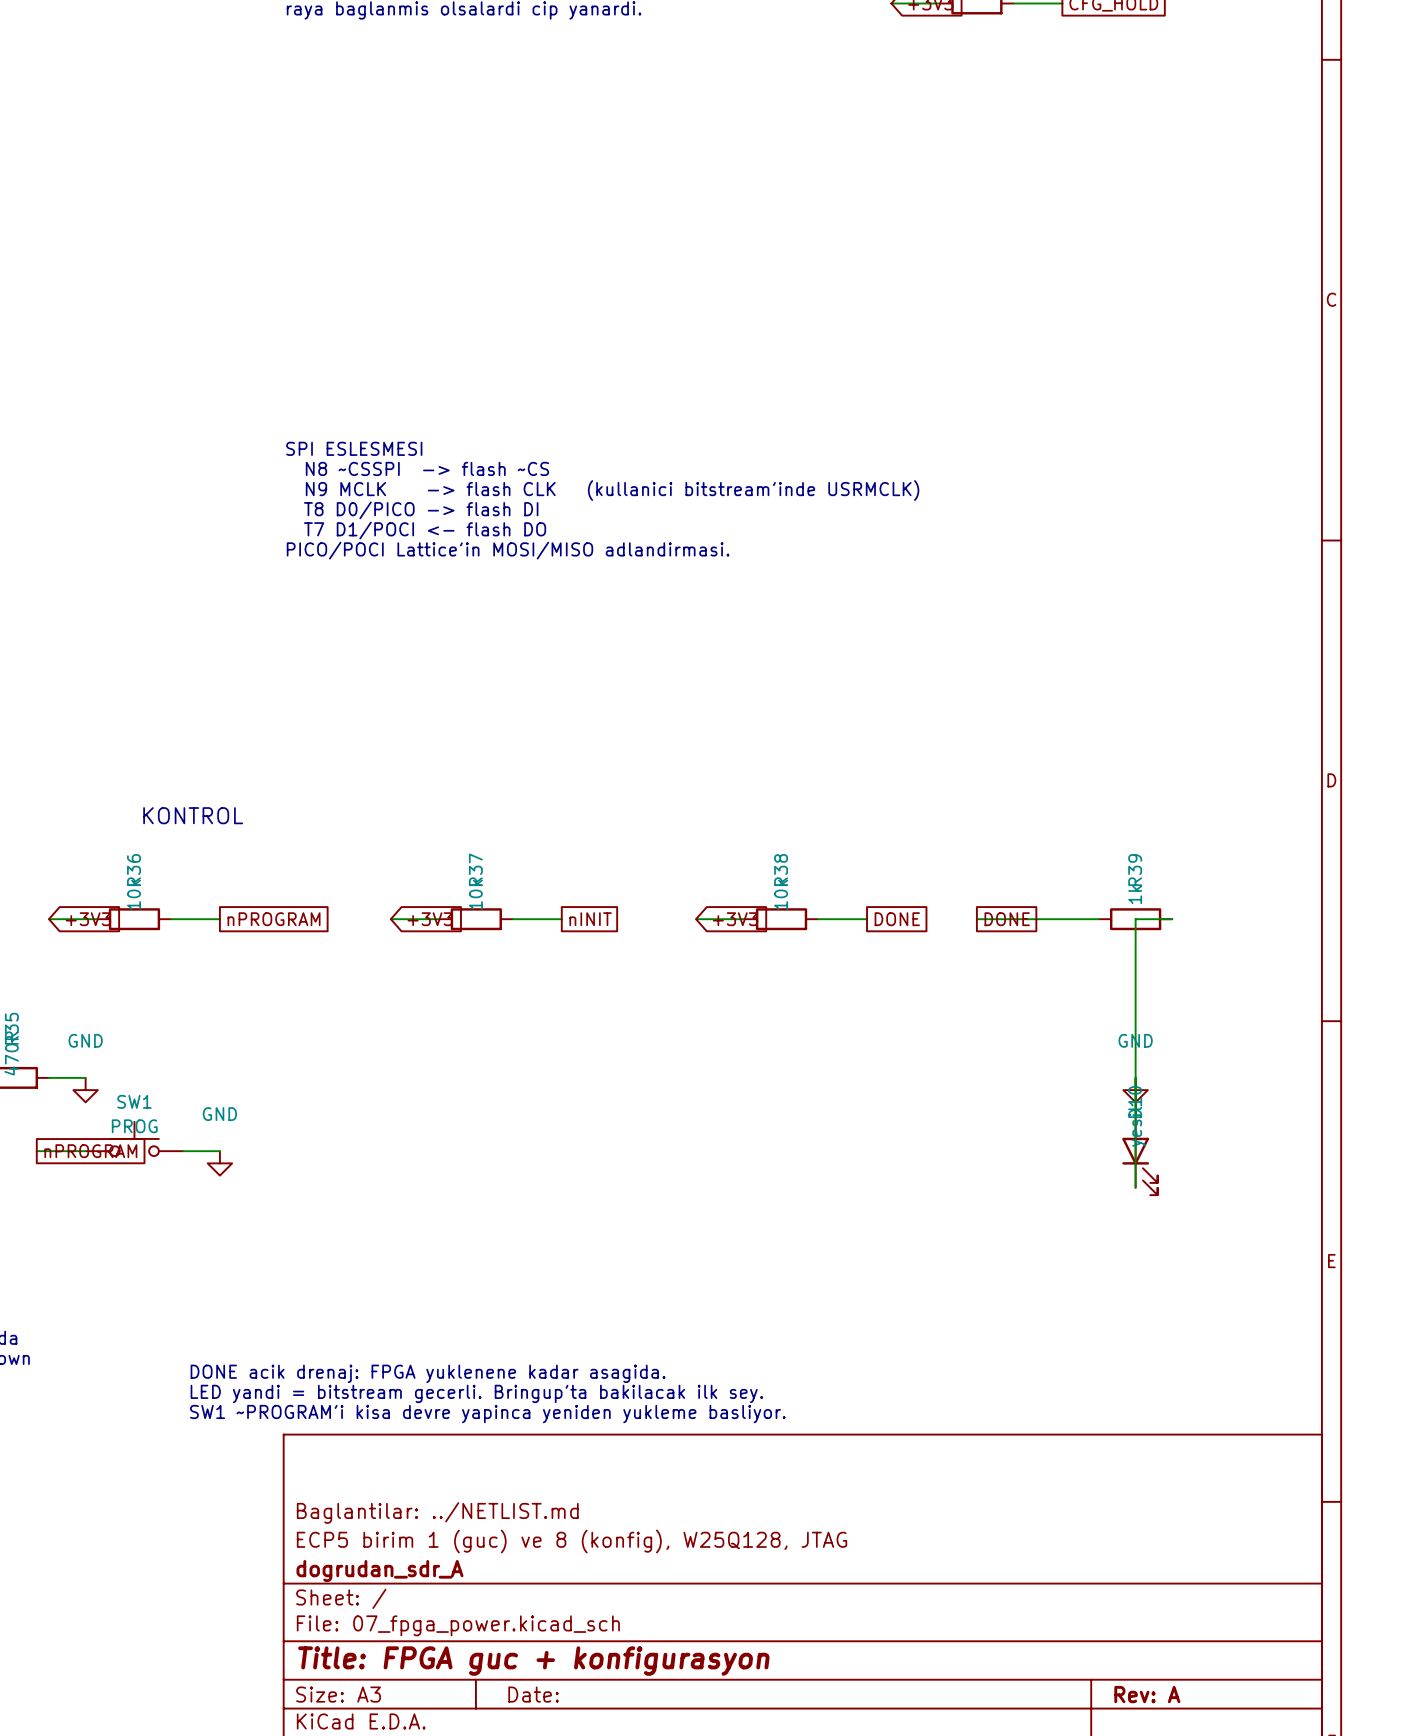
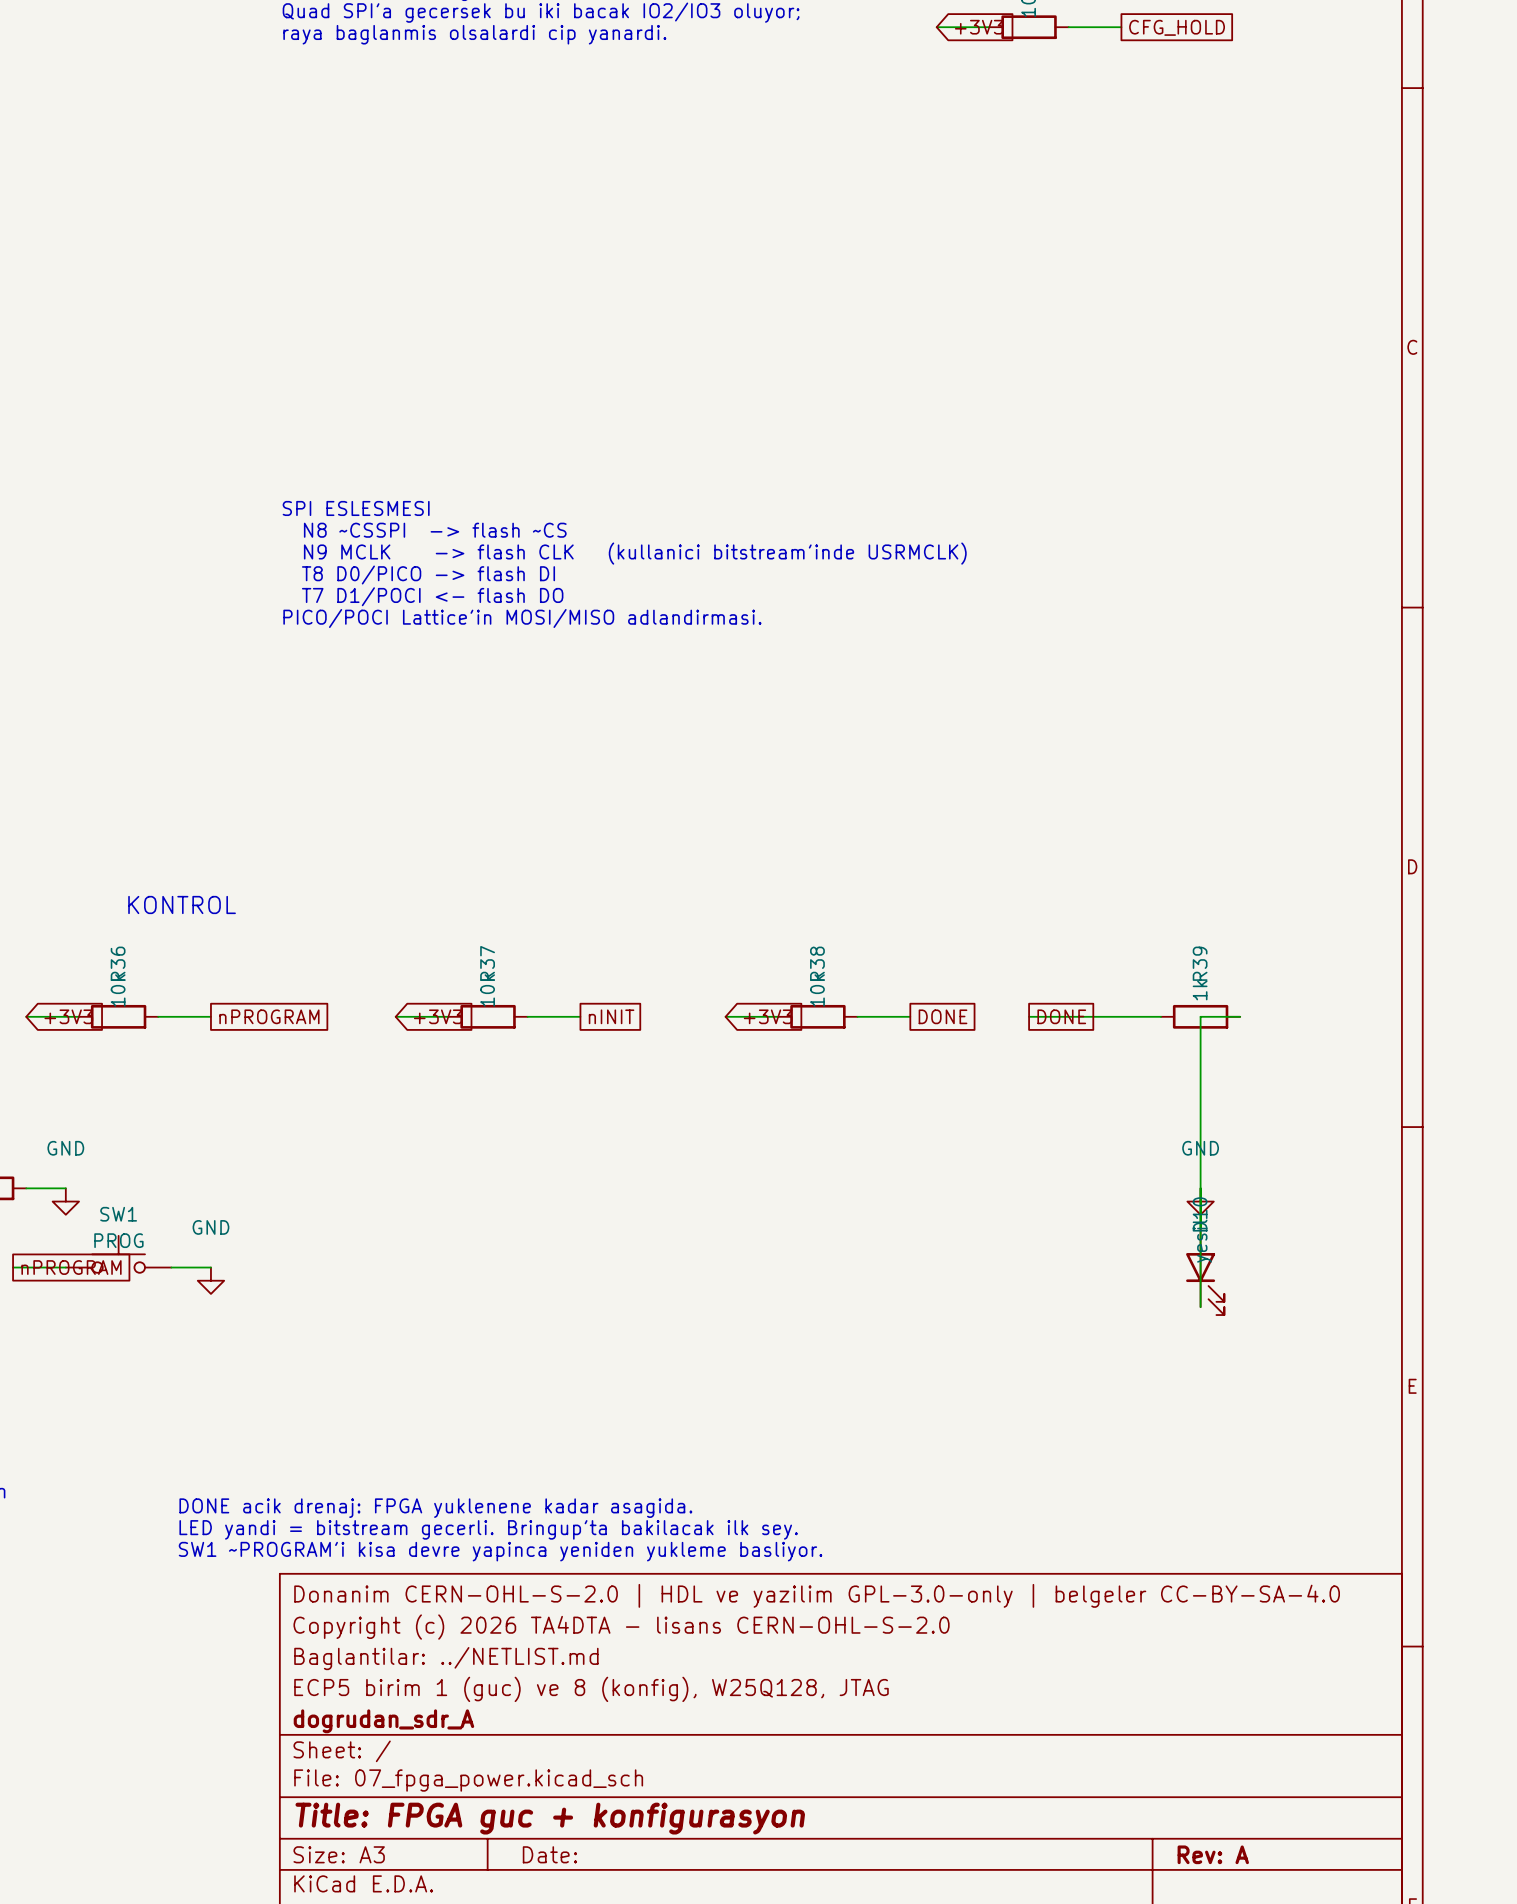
title block: none -> Donanim CERN-OHL-S-2.0 | HDL ve yazilim GPL-3.0-only | belgeler CC-BY-SA-4.0 (817, 1595)
title block: none -> Copyright (c) 2026 TA4DTA - lisans CERN-OHL-S-2.0 (621, 1627)

